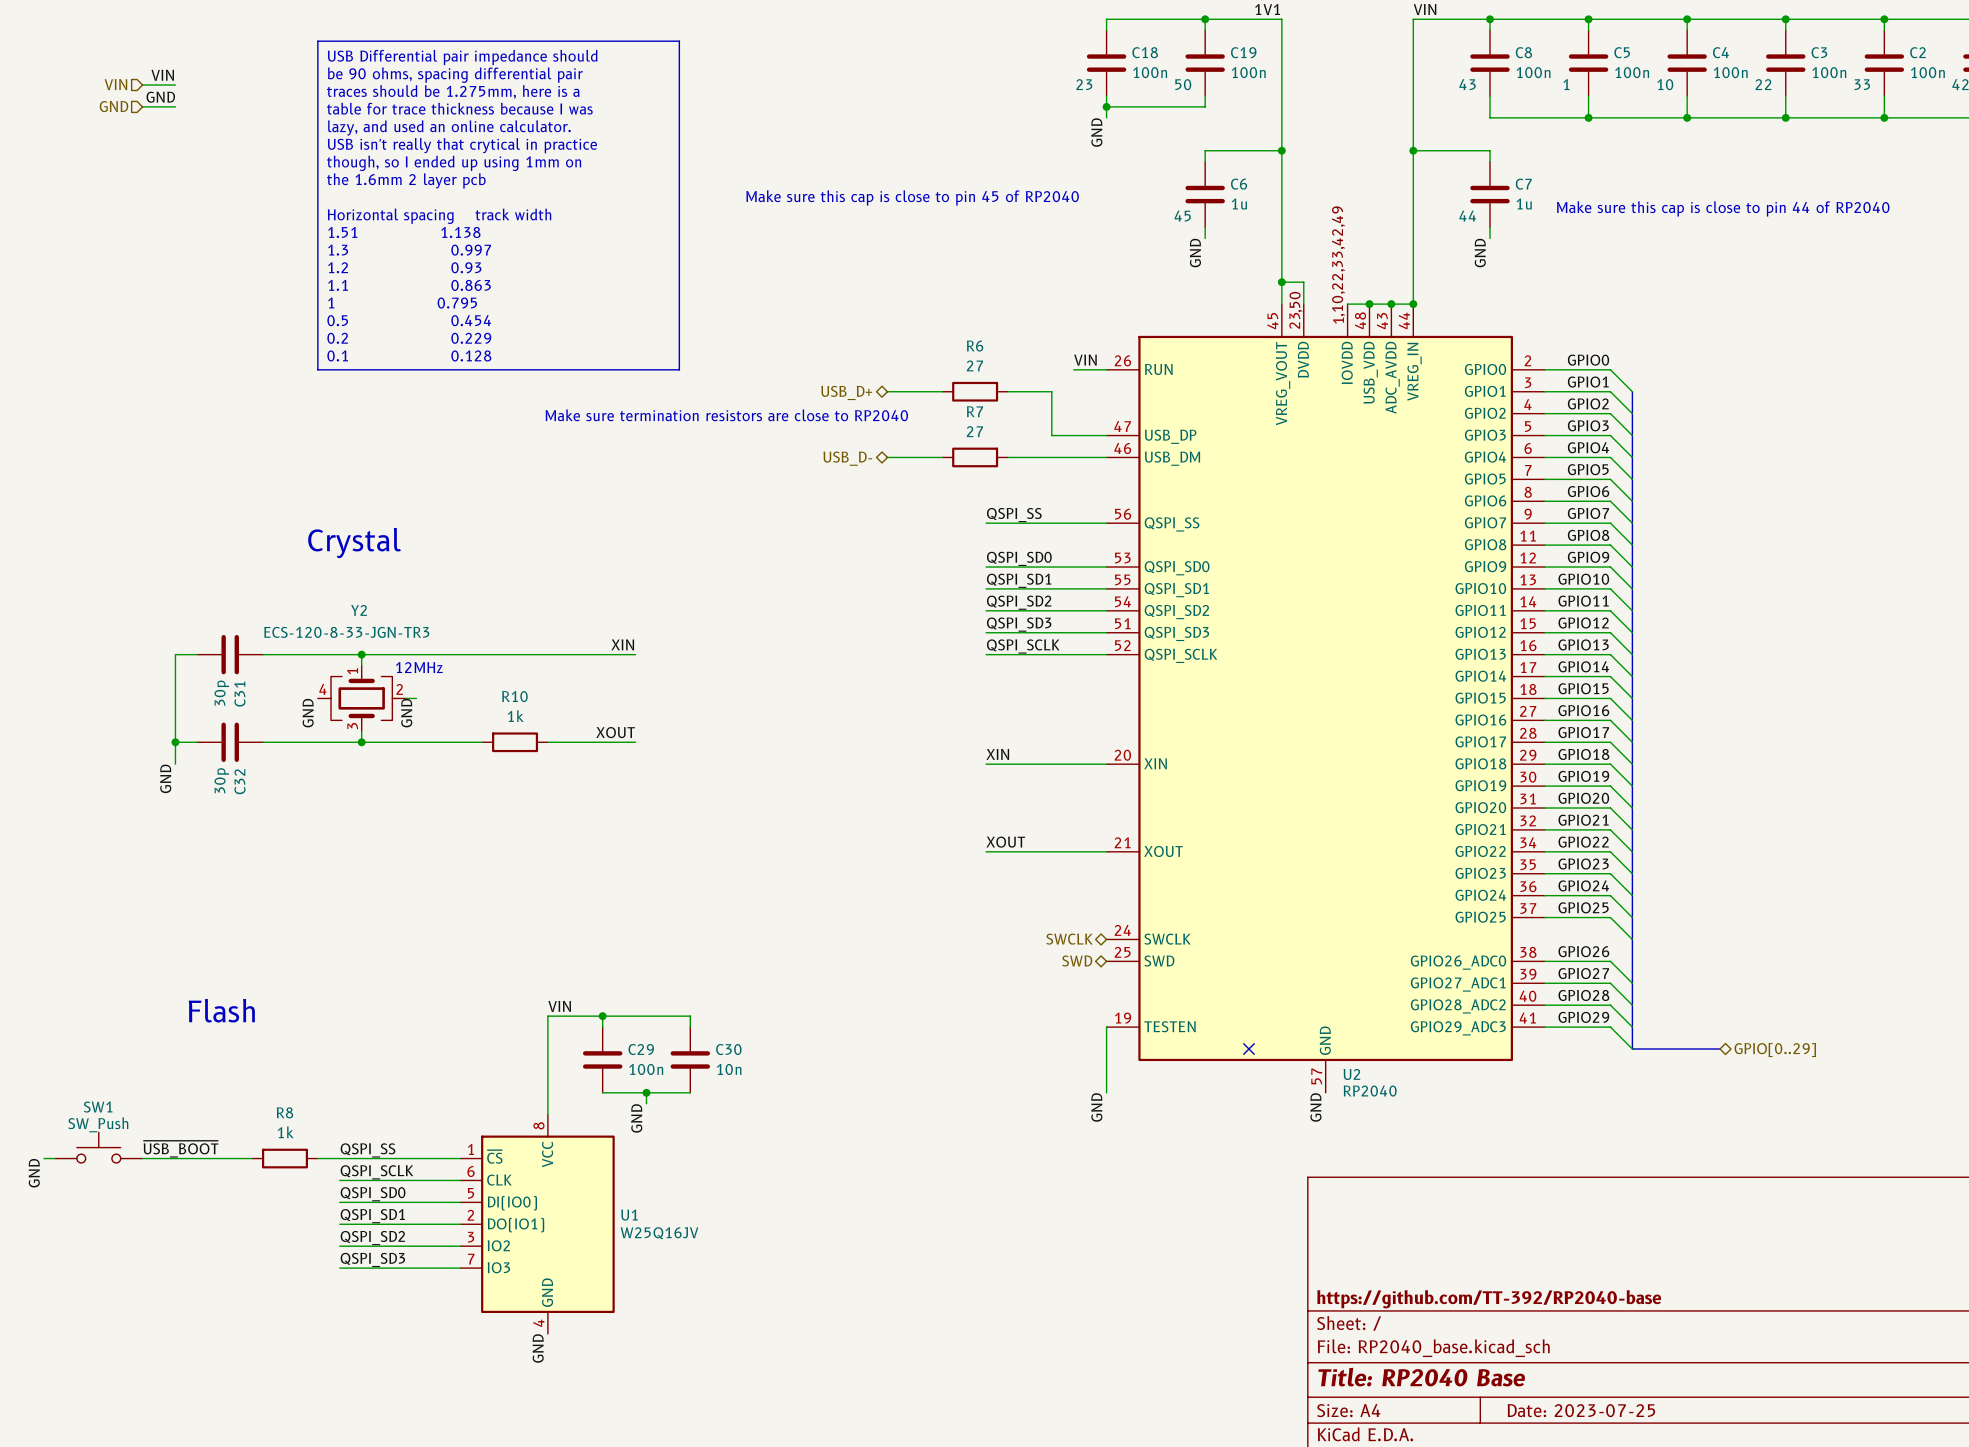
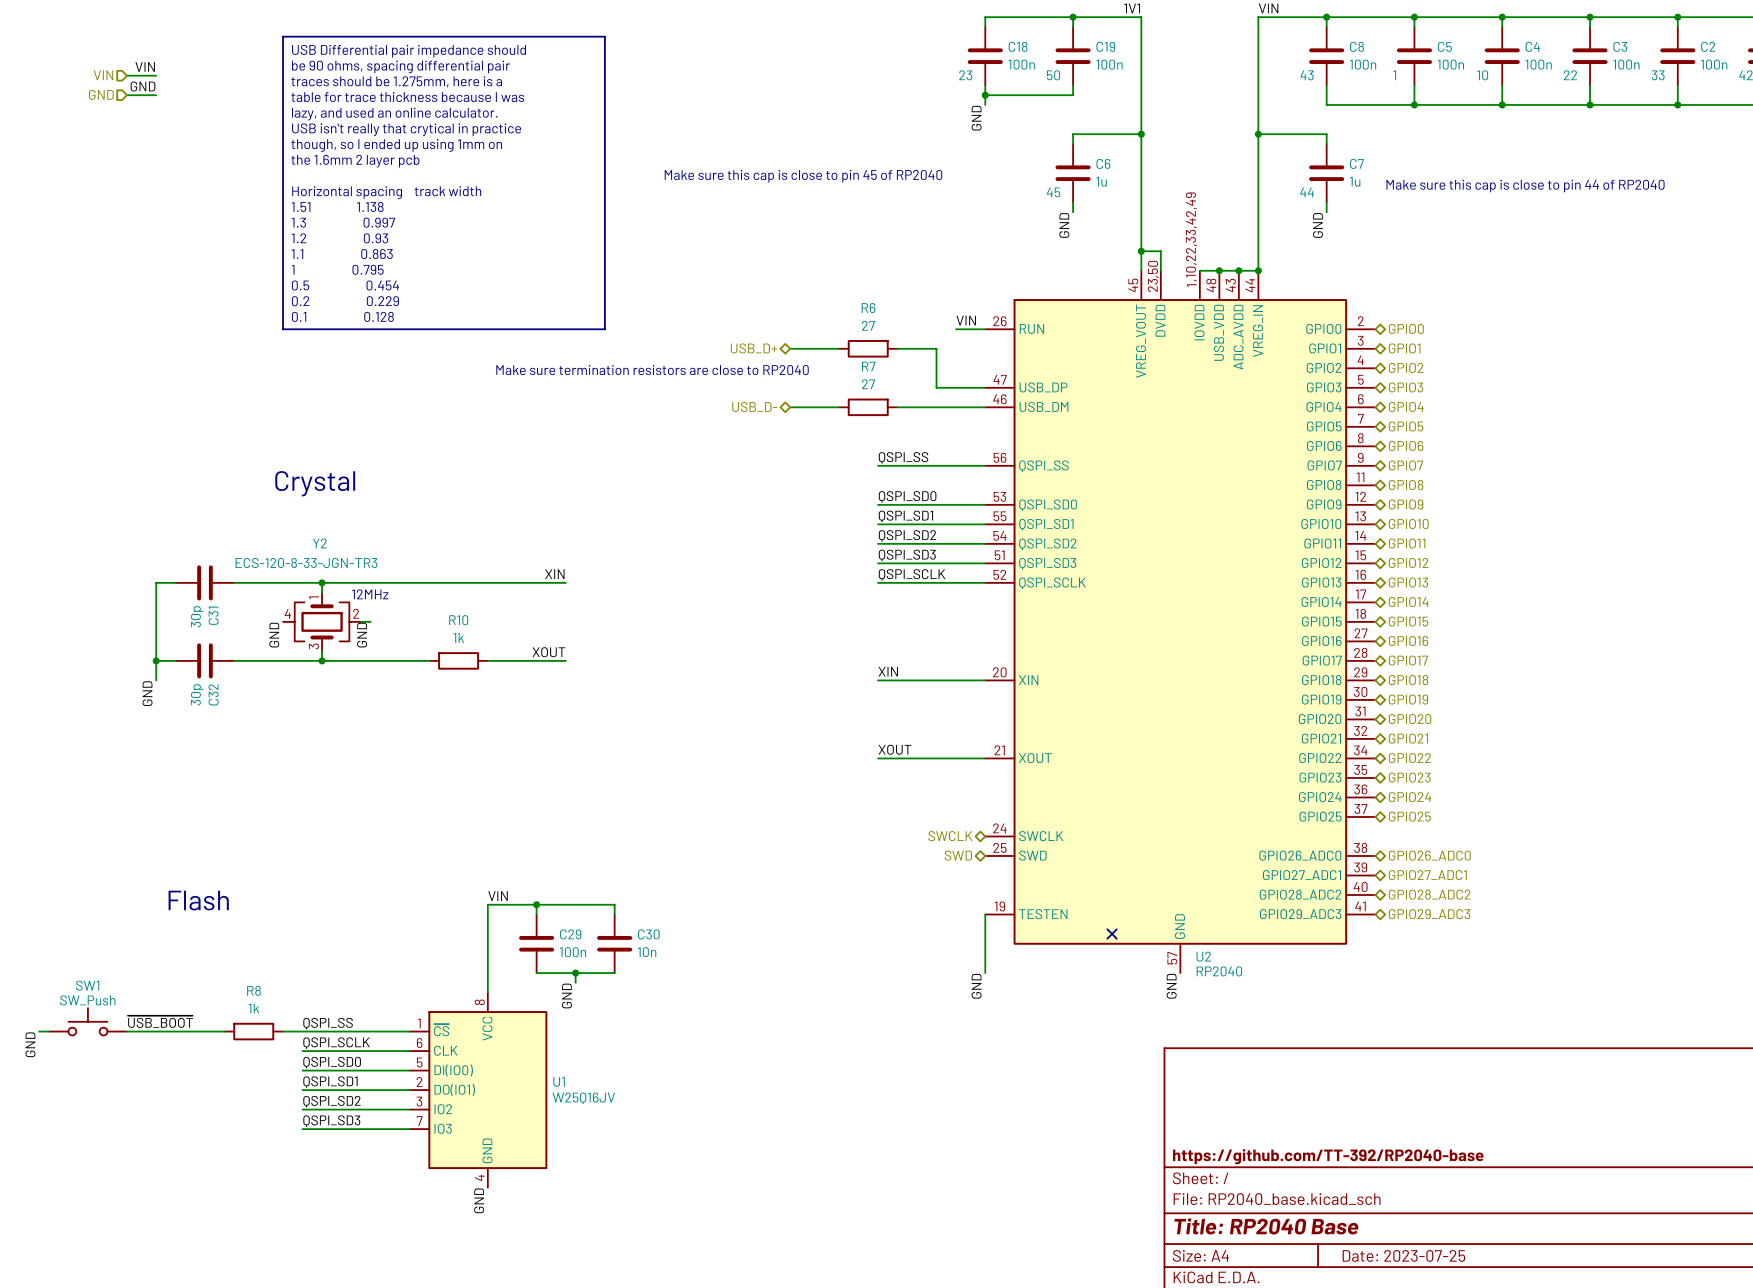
label: GPIO0 (1588, 360) -> none
wire: (1544, 369) (1610, 369) (1632, 391) -> none
hierarchical label: none -> GPIO0 (1406, 328)
label: GPIO1 (1588, 382) -> none
wire: (1544, 391) (1610, 391) (1632, 413) -> none
hierarchical label: none -> GPIO1 (1404, 348)
bus: (1632, 391) (1632, 1049) (1720, 1049) -> none
label: GPIO2 (1588, 403) -> none
wire: (1544, 413) (1610, 413) (1632, 435) -> none
hierarchical label: none -> GPIO2 (1406, 367)
label: GPIO3 (1588, 425) -> none
wire: (1544, 435) (1610, 435) (1632, 457) -> none
hierarchical label: none -> GPIO3 (1405, 387)
label: GPIO4 (1588, 447) -> none
wire: (1544, 457) (1610, 457) (1632, 479) -> none
hierarchical label: none -> GPIO4 (1406, 406)
label: GPIO5 (1588, 469) -> none
wire: (1544, 479) (1610, 479) (1632, 501) -> none
hierarchical label: none -> GPIO5 (1406, 426)
label: GPIO6 (1588, 491) -> none
hierarchical label: none -> GPIO6 (1406, 445)
wire: (1544, 501) (1610, 501) (1632, 523) -> none
label: GPIO7 (1588, 513) -> none
hierarchical label: none -> GPIO7 (1405, 465)
wire: (1544, 523) (1610, 523) (1632, 545) -> none
label: GPIO8 (1588, 535) -> none
hierarchical label: none -> GPIO8 (1406, 484)
wire: (1544, 545) (1610, 545) (1632, 567) -> none
label: GPIO9 (1588, 557) -> none
hierarchical label: none -> GPIO9 (1406, 504)
wire: (1544, 567) (1610, 567) (1632, 588) -> none
label: GPIO10 (1583, 579) -> none
wire: (1544, 588) (1610, 588) (1632, 610) -> none
hierarchical label: none -> GPIO10 (1408, 524)
label: GPIO11 (1583, 601) -> none
wire: (1544, 610) (1610, 610) (1632, 632) -> none
hierarchical label: none -> GPIO11 (1407, 543)
label: GPIO12 (1583, 623) -> none
wire: (1544, 632) (1610, 632) (1632, 654) -> none
hierarchical label: none -> GPIO12 (1408, 563)
label: GPIO13 (1583, 644) -> none
wire: (1544, 654) (1610, 654) (1632, 676) -> none
hierarchical label: none -> GPIO13 (1408, 582)
label: GPIO14 (1583, 666) -> none
wire: (1544, 676) (1610, 676) (1632, 698) -> none
hierarchical label: none -> GPIO14 (1408, 602)
label: GPIO15 (1583, 688) -> none
wire: (1544, 698) (1610, 698) (1632, 720) -> none
hierarchical label: none -> GPIO15 (1408, 621)
label: GPIO16 (1583, 710) -> none
wire: (1544, 720) (1610, 720) (1632, 742) -> none
hierarchical label: none -> GPIO16 (1408, 641)
label: GPIO17 (1583, 732) -> none
hierarchical label: none -> GPIO17 (1408, 660)
wire: (1544, 742) (1610, 742) (1632, 764) -> none
label: GPIO18 (1583, 754) -> none
hierarchical label: none -> GPIO18 (1408, 680)
wire: (1544, 764) (1610, 764) (1632, 786) -> none
label: GPIO19 (1583, 776) -> none
hierarchical label: none -> GPIO19 (1408, 699)
wire: (1544, 786) (1610, 786) (1632, 808) -> none
label: GPIO20 (1583, 798) -> none
hierarchical label: none -> GPIO20 (1410, 719)
wire: (1544, 808) (1610, 808) (1632, 829) -> none
label: GPIO21 (1583, 820) -> none
wire: (1544, 829) (1610, 829) (1632, 851) -> none
hierarchical label: none -> GPIO21 (1408, 738)
label: GPIO22 (1583, 842) -> none
wire: (1544, 851) (1610, 851) (1632, 873) -> none
hierarchical label: none -> GPIO22 (1409, 758)
label: GPIO23 (1583, 864) -> none
wire: (1544, 873) (1610, 873) (1632, 895) -> none
hierarchical label: none -> GPIO23 (1409, 777)
label: GPIO24 (1583, 885) -> none
wire: (1544, 895) (1610, 895) (1632, 917) -> none
hierarchical label: none -> GPIO24 (1410, 797)
label: GPIO25 (1583, 907) -> none
wire: (1544, 917) (1610, 917) (1632, 939) -> none
hierarchical label: none -> GPIO25 (1409, 816)
label: GPIO26 (1583, 951) -> none
wire: (1544, 961) (1610, 961) (1632, 983) -> none
hierarchical label: none -> GPIO26_ADC0 (1429, 855)
label: GPIO27 (1583, 973) -> none
wire: (1544, 983) (1610, 983) (1632, 1005) -> none
hierarchical label: none -> GPIO27_ADC1 (1427, 875)
label: GPIO28 (1583, 995) -> none
wire: (1544, 1005) (1610, 1005) (1632, 1027) -> none
hierarchical label: none -> GPIO28_ADC2 (1429, 894)
label: GPIO29 (1583, 1017) -> none
wire: (1544, 1027) (1610, 1027) (1632, 1049) -> none
hierarchical label: none -> GPIO29_ADC3 (1429, 914)
hierarchical label: GPIO[0..29] (1775, 1050) -> none

